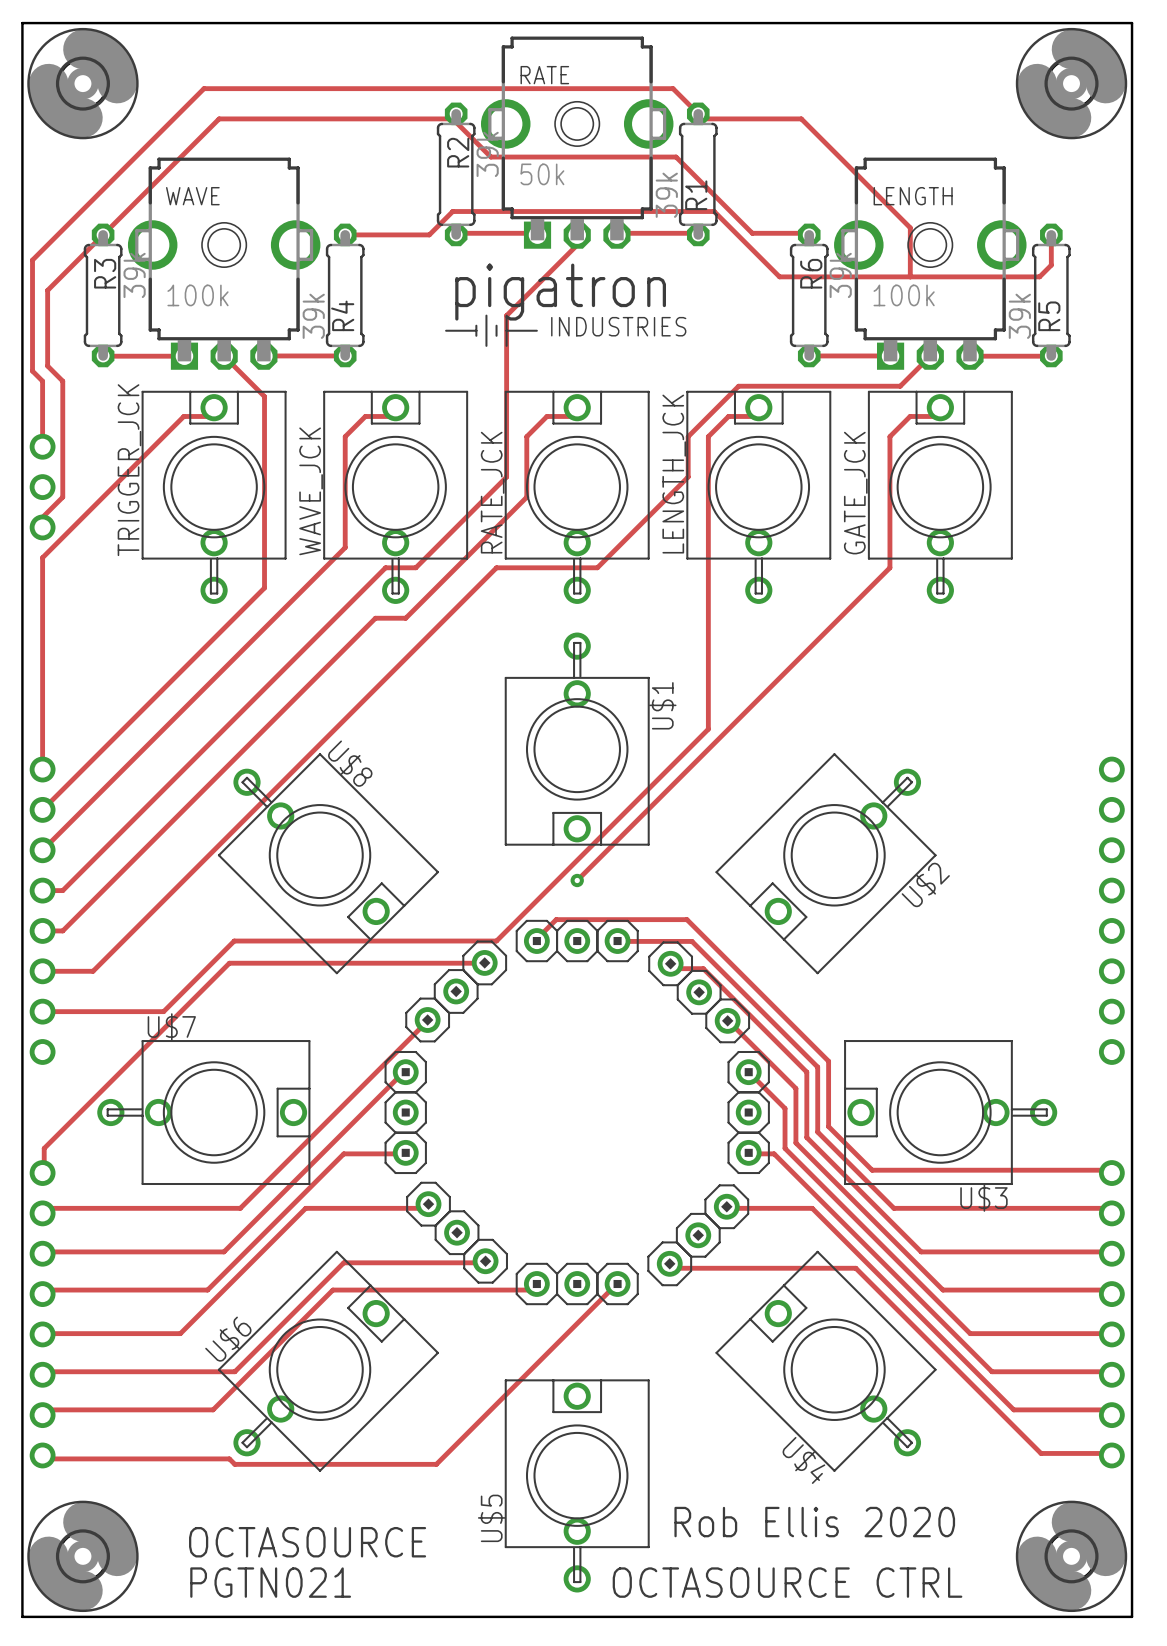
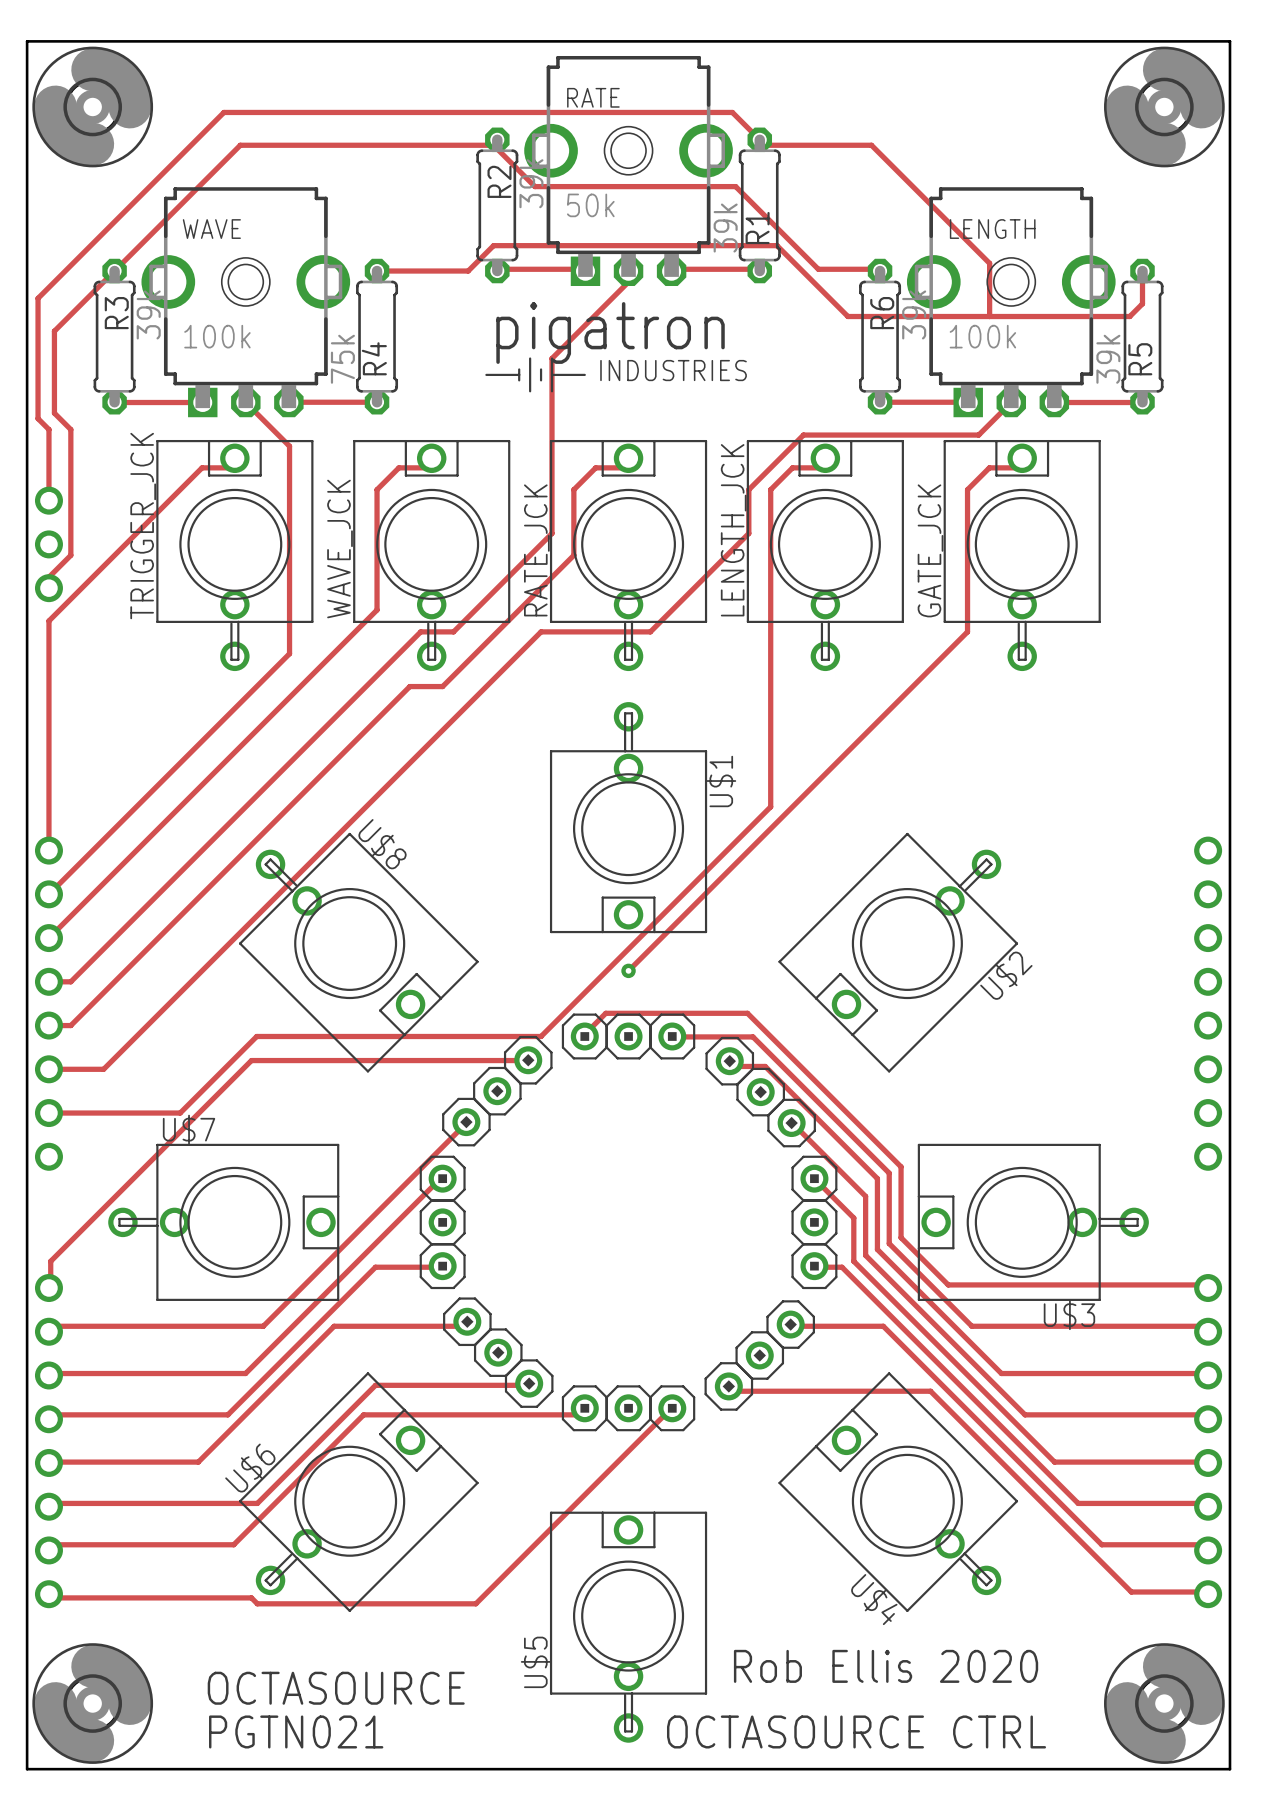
R4 value: 39k (313, 316) -> 75k (342, 359)

